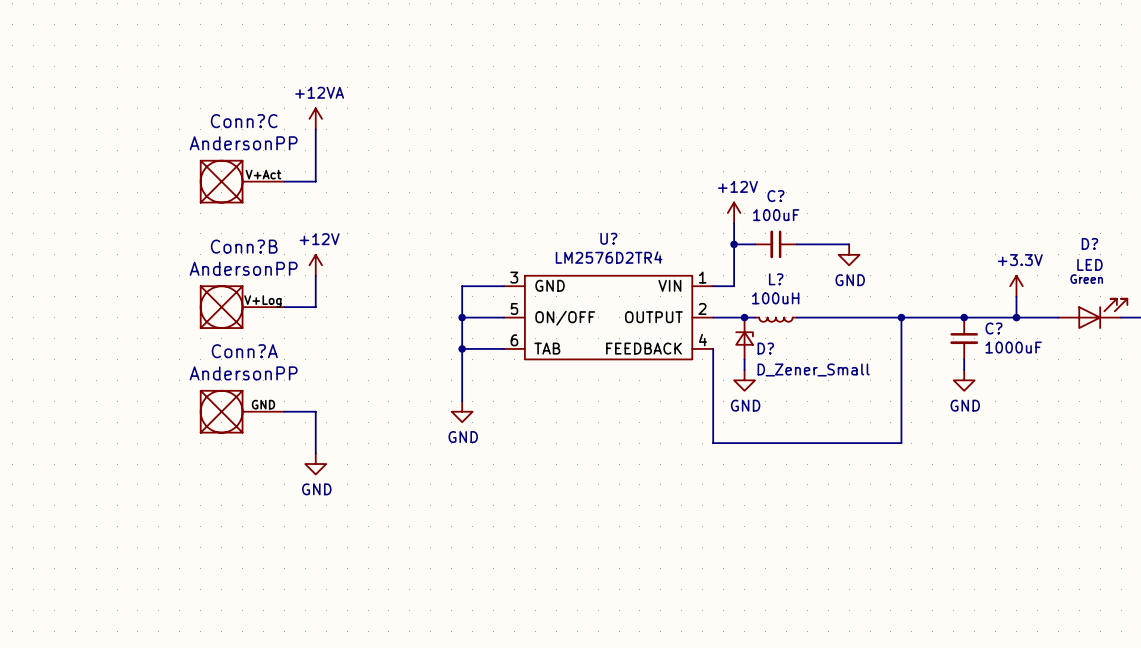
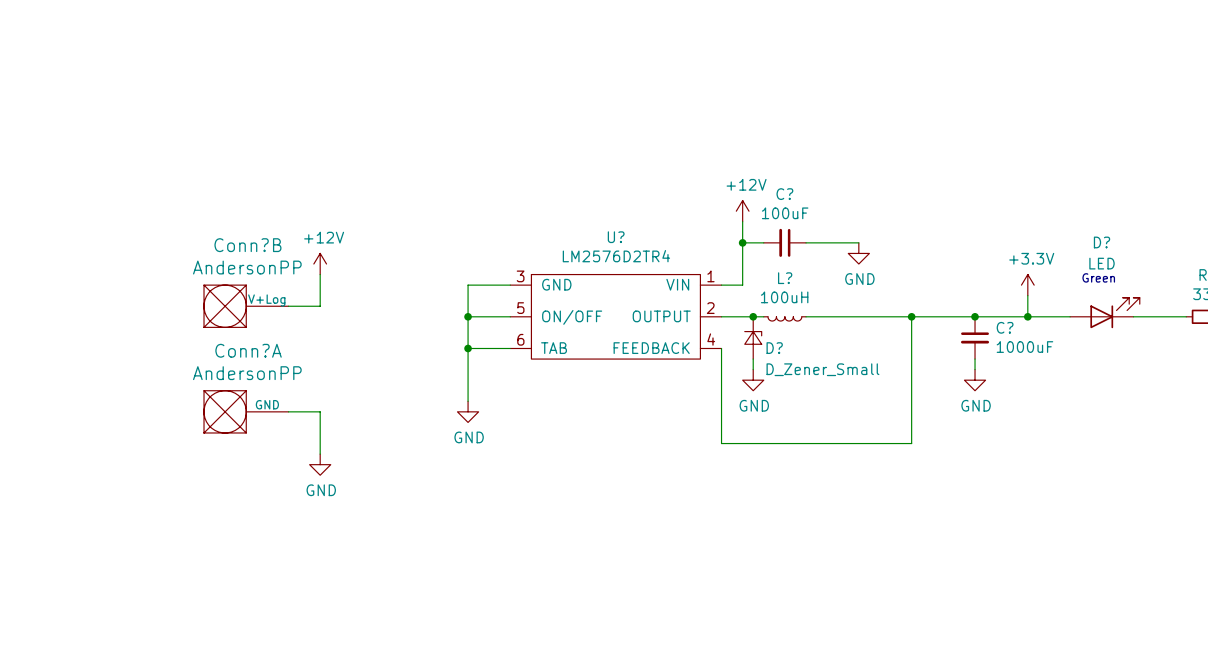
power symbol: +12VA (315, 118) -> none
wire: (315, 129) (315, 181) (284, 181) -> none
Conn?C: AndersonPP (242, 181) -> none

